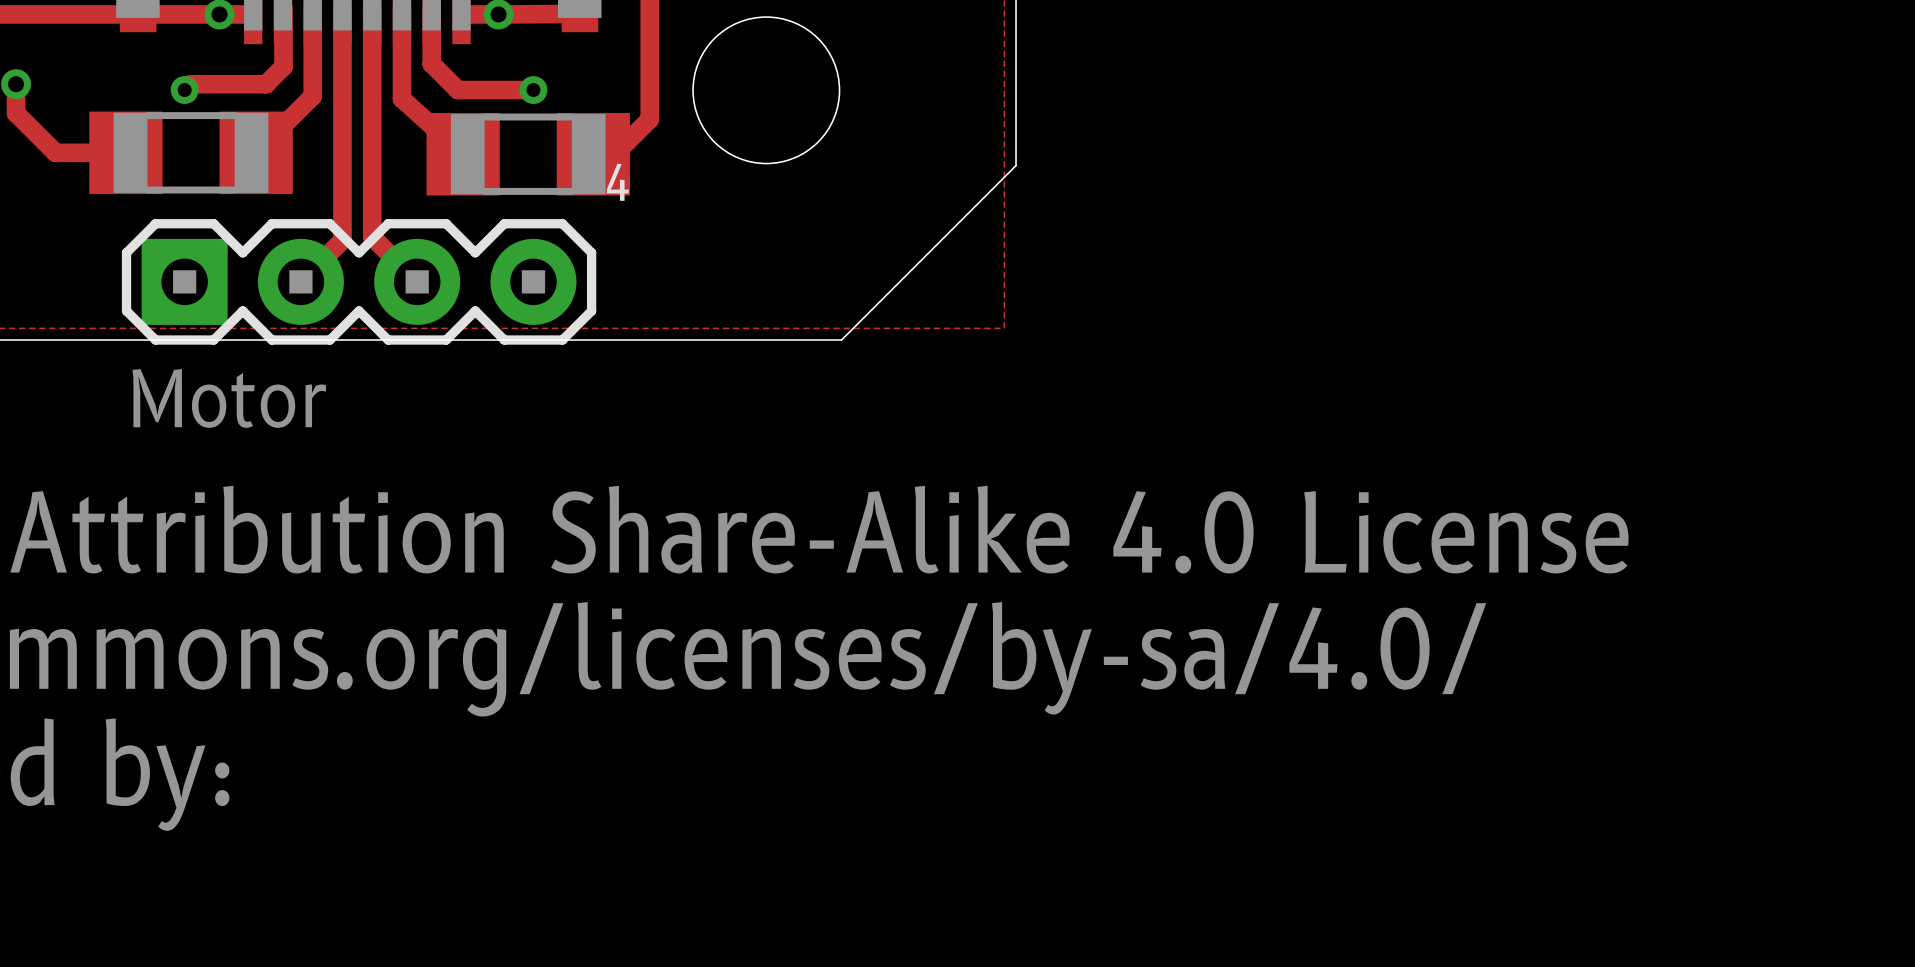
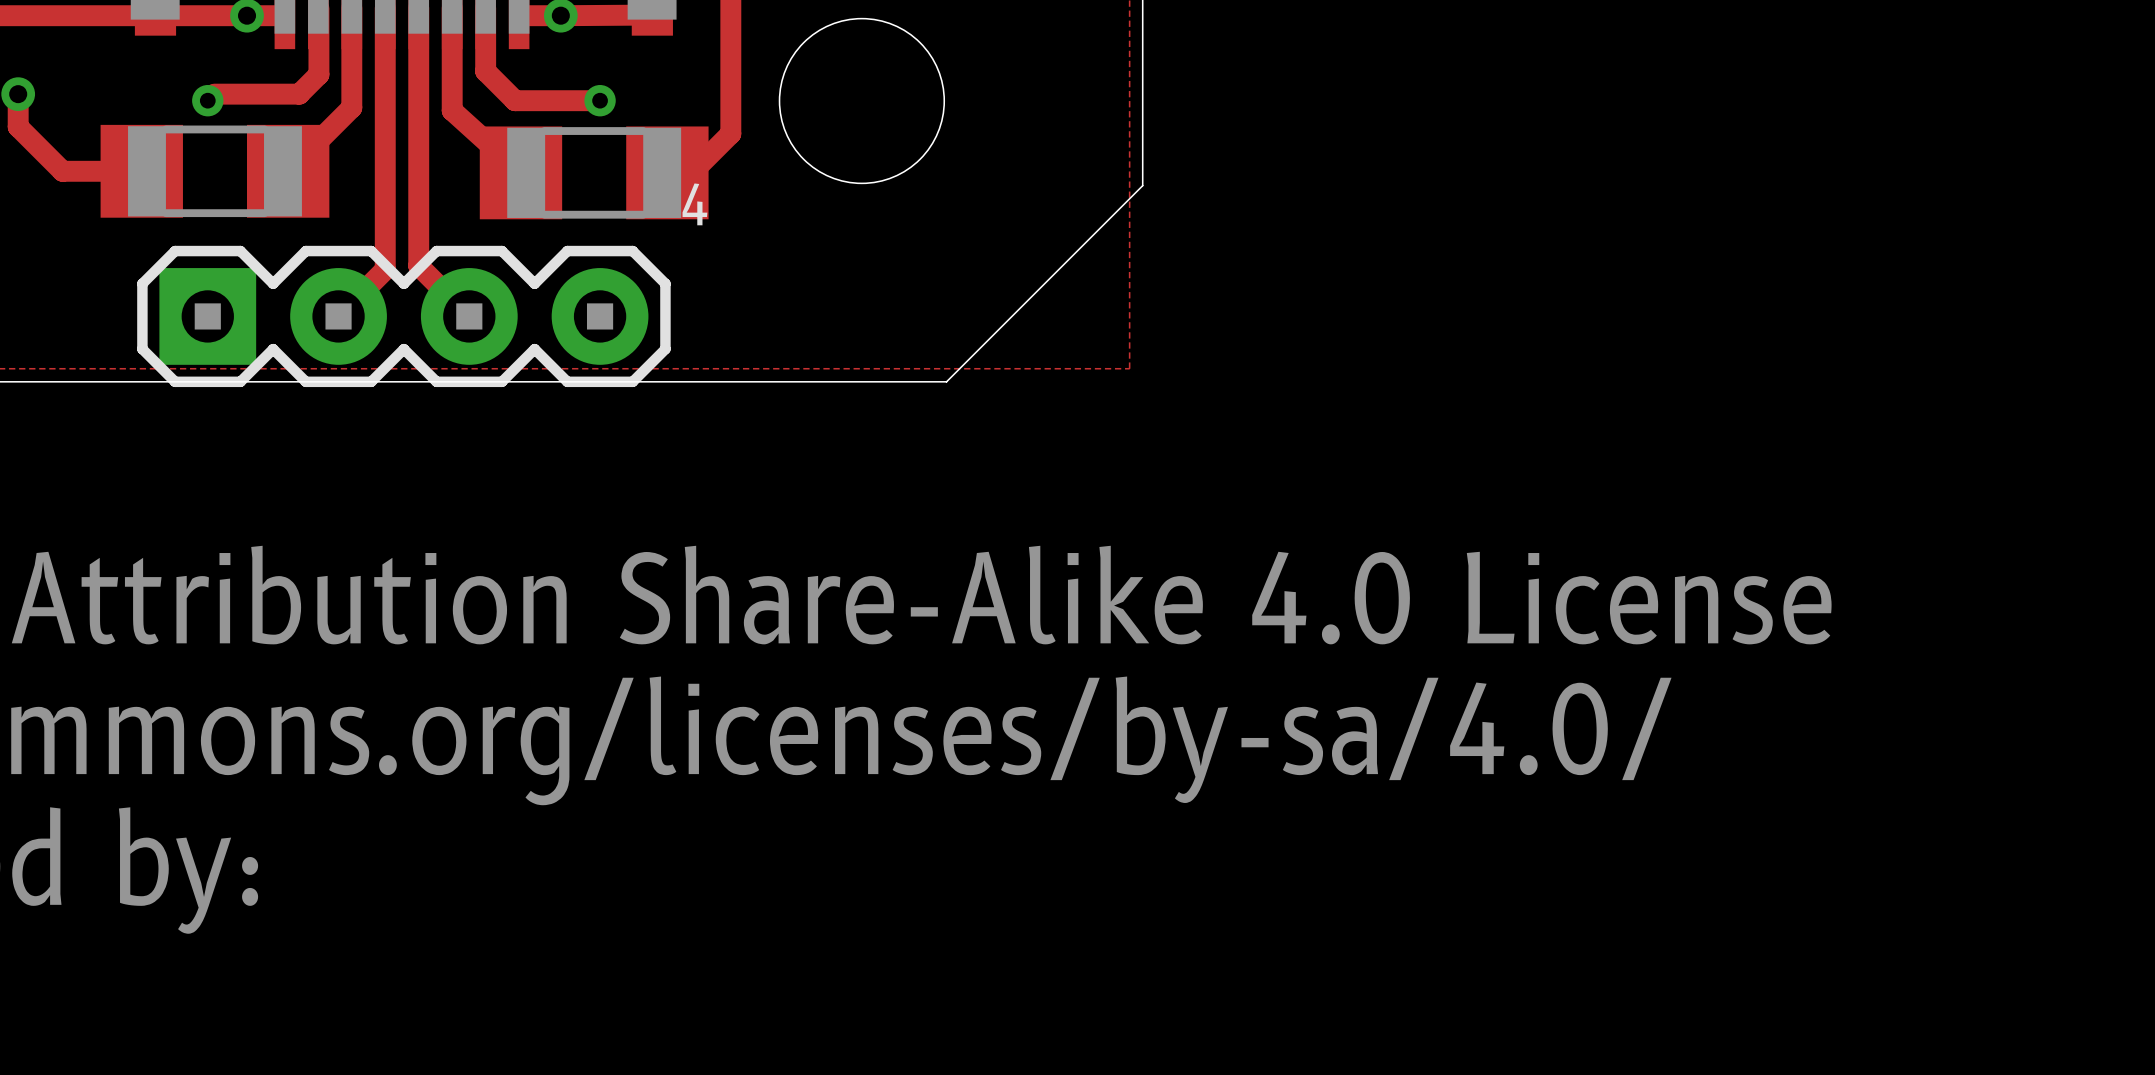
part value: Motor (229, 398) -> none

